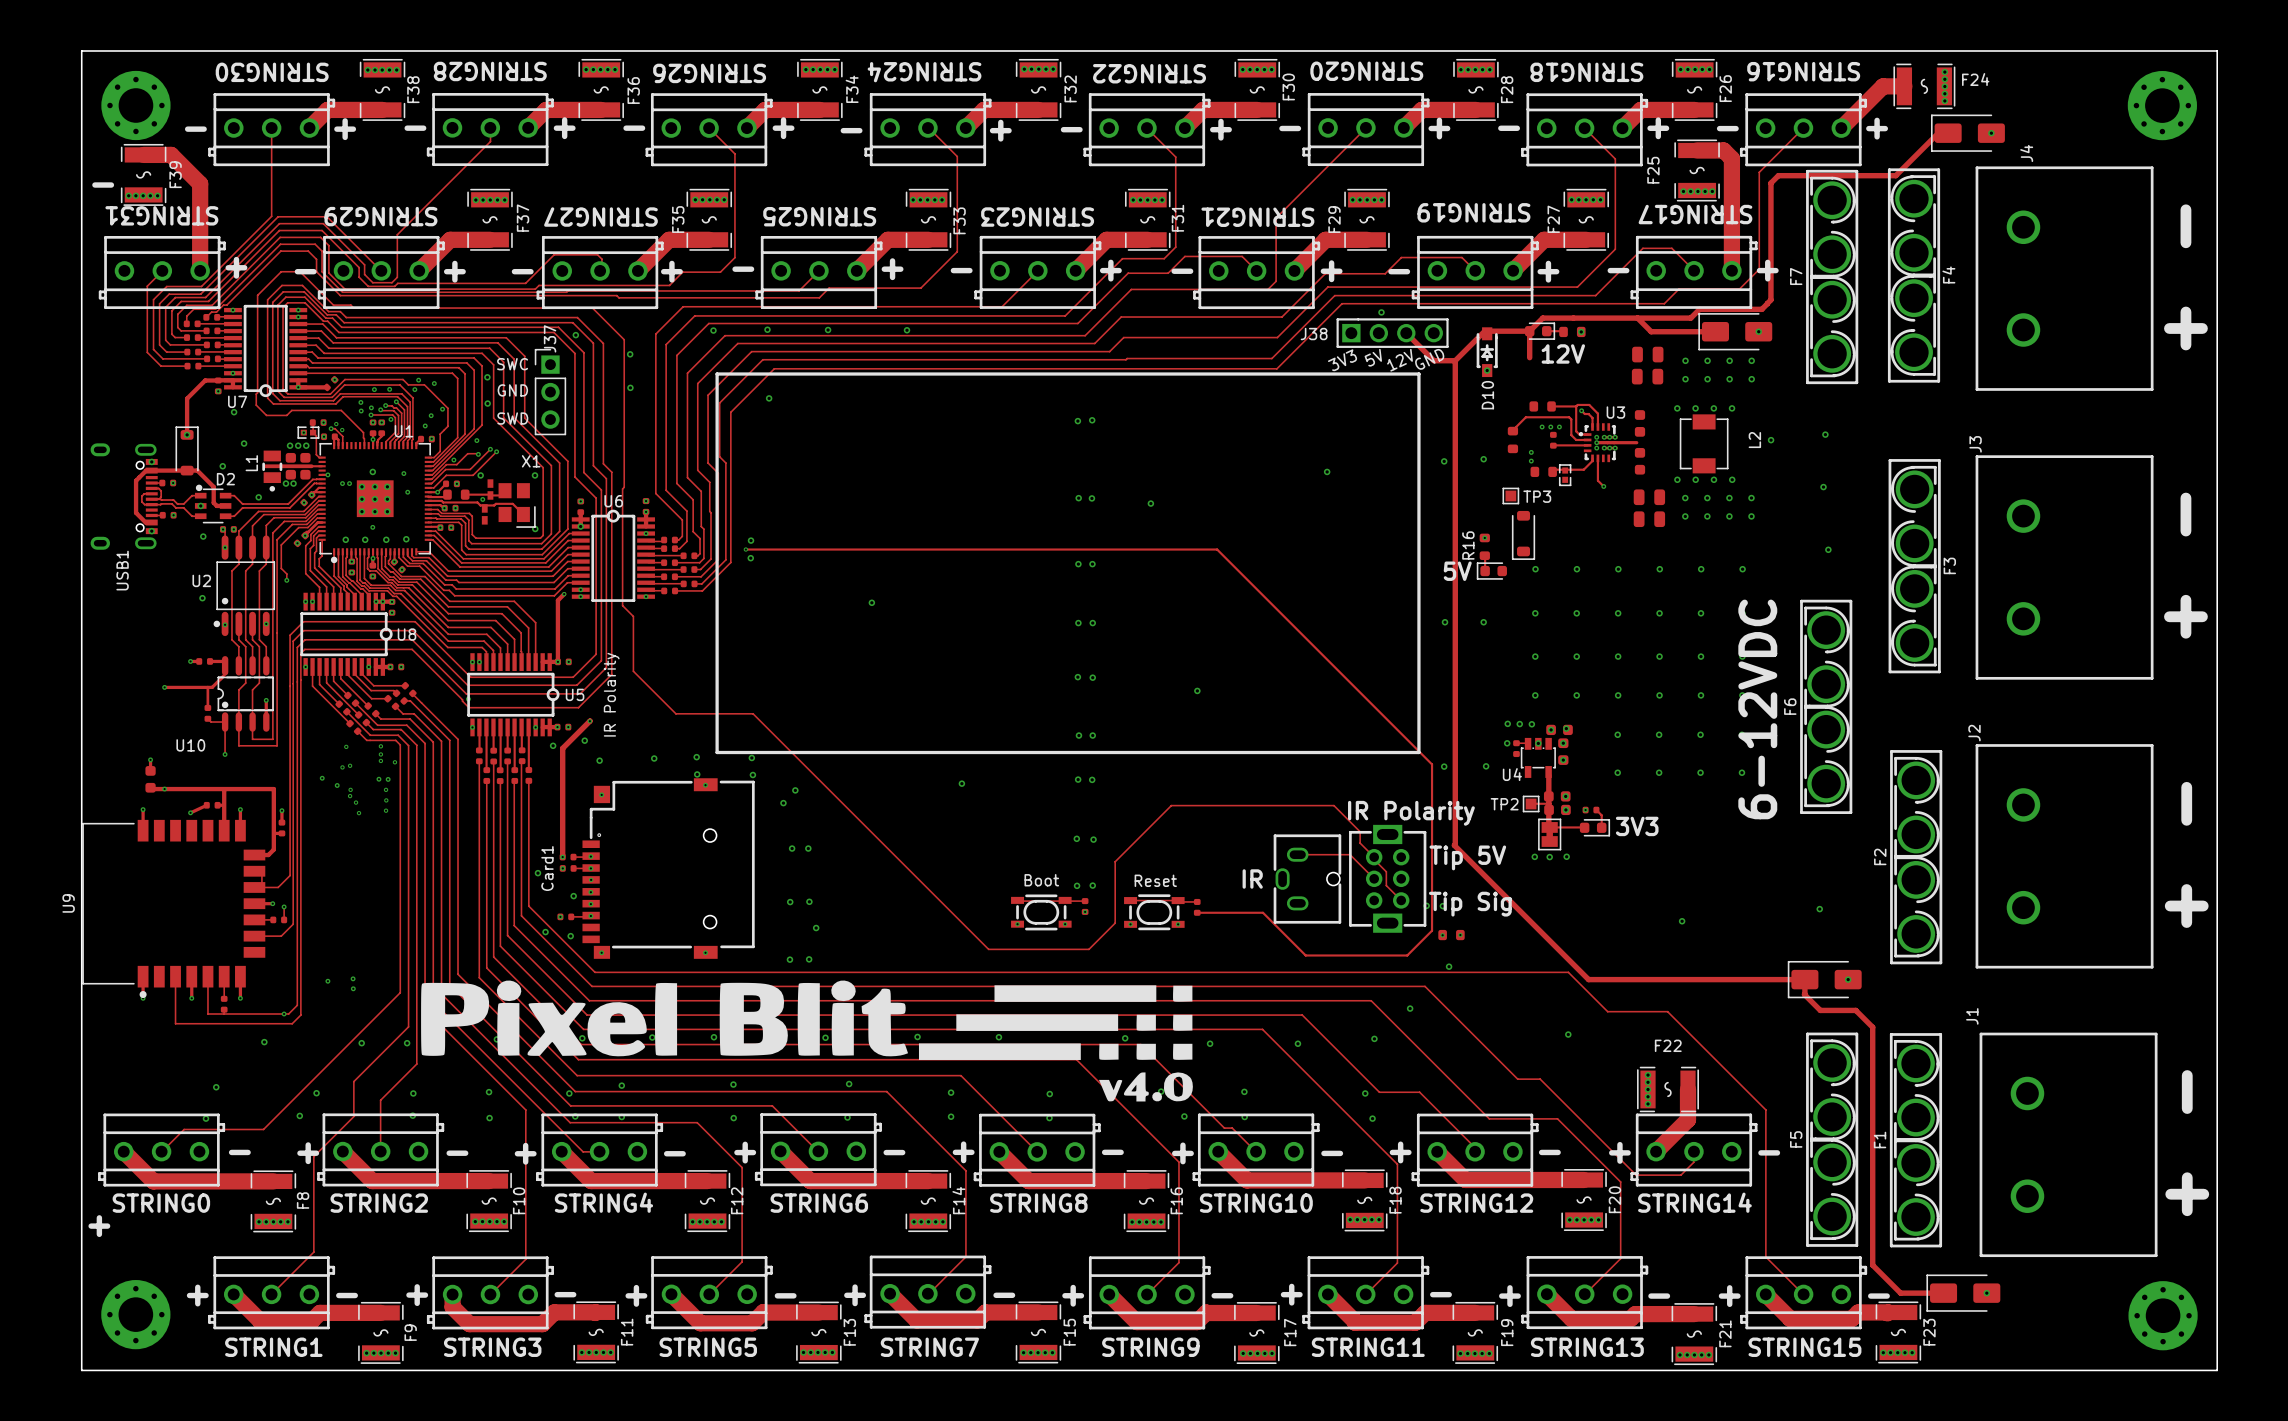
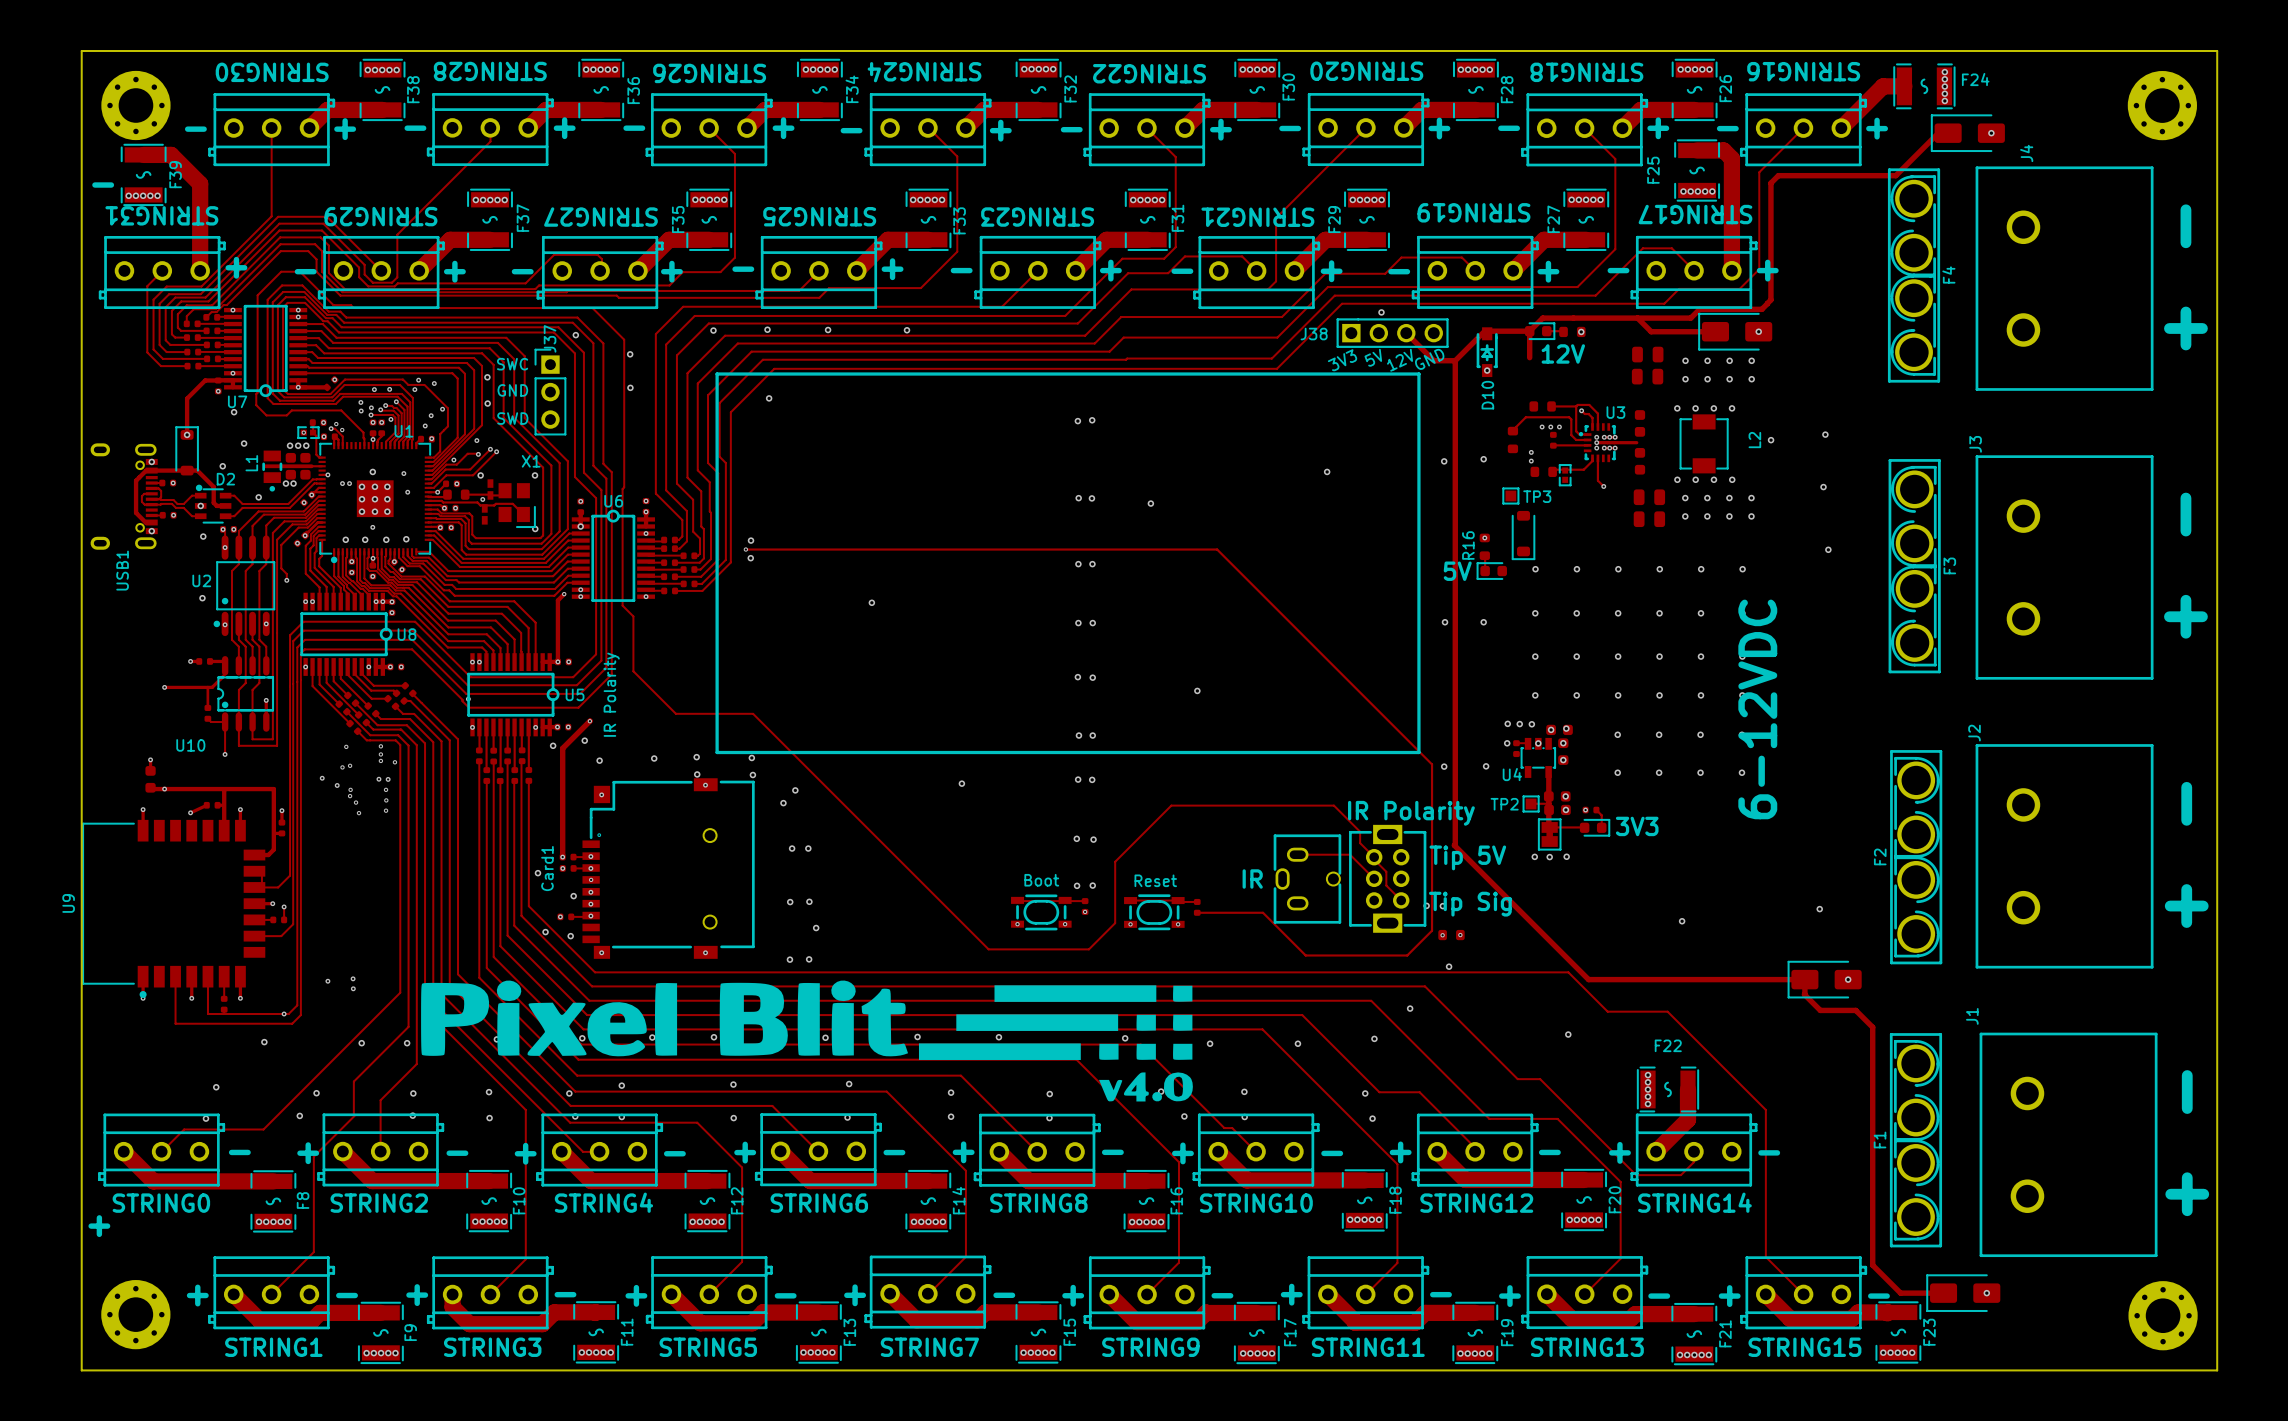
F7: (1832, 277) -> none
F6: (1826, 706) -> none
F5: (1832, 1139) -> none

